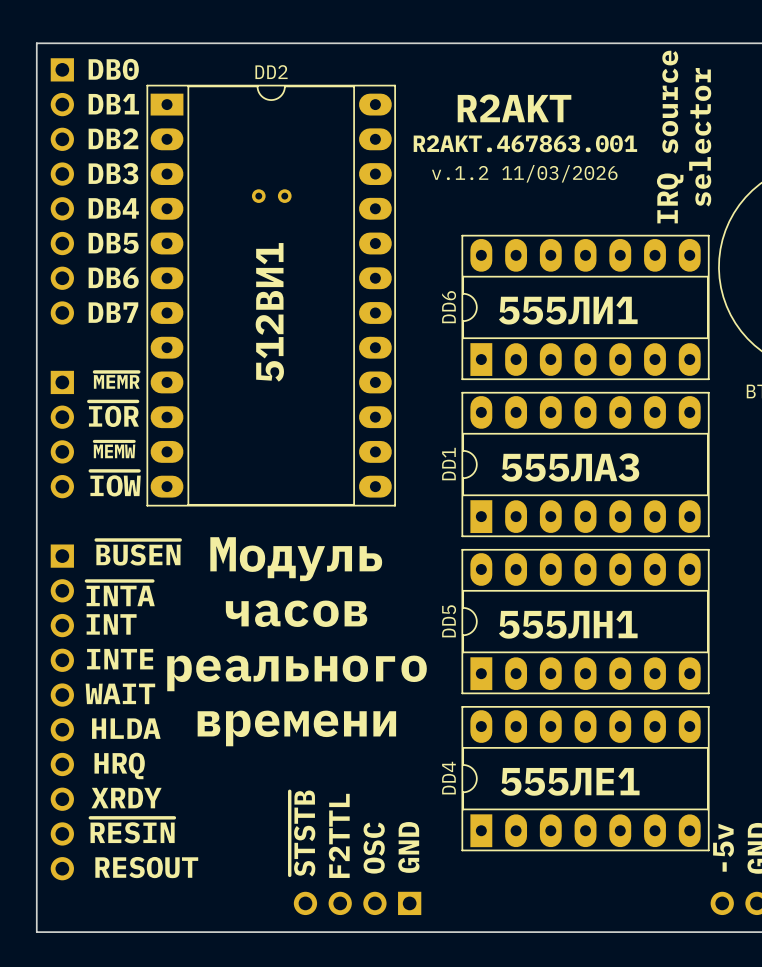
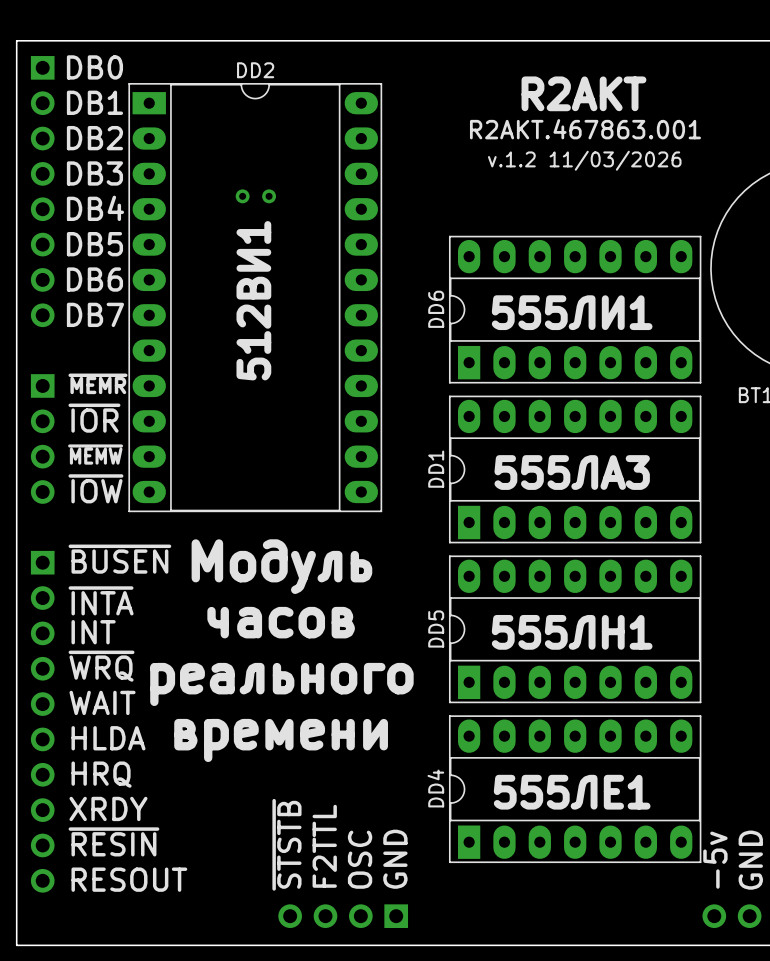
text position: R2AKT (514, 108) -> R2AKT (583, 93)
text: IRQ source (670, 137) -> none
text: selector (700, 137) -> none
text position: R2AKT.467863.001 (525, 143) -> R2AKT.467863.001 (585, 129)
text position: v.1.2 11/03/2026 (524, 173) -> v.1.2 11/03/2026 (584, 160)
text: INTE (120, 659) -> ~{WRQ} (101, 666)

